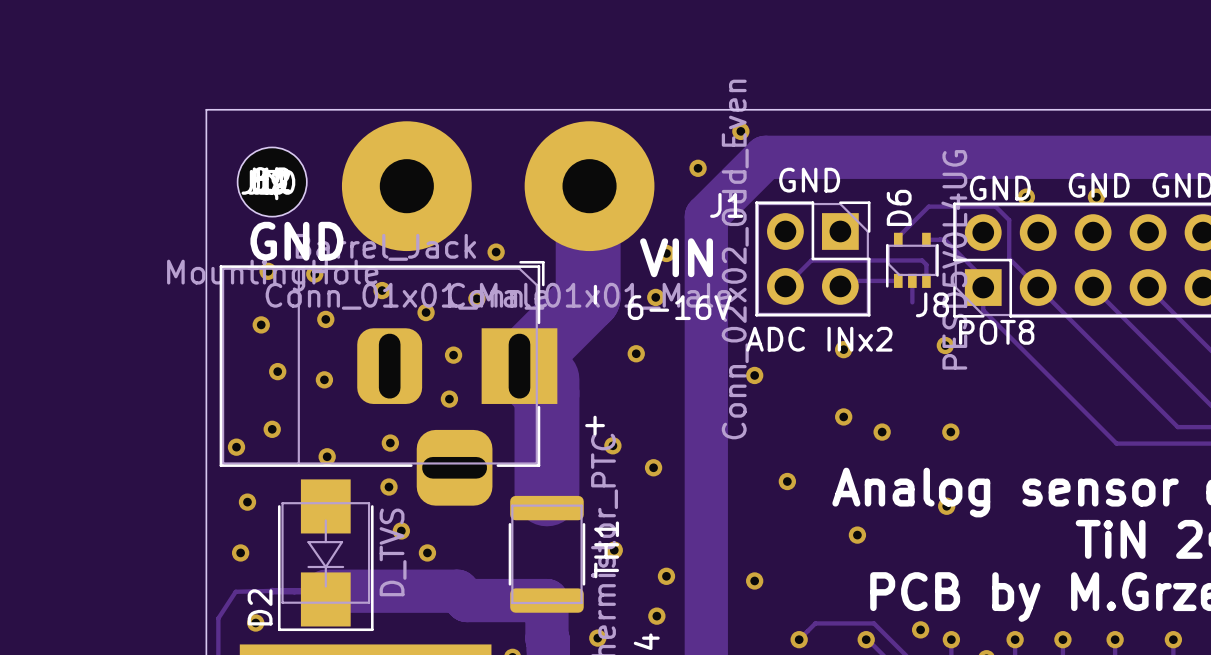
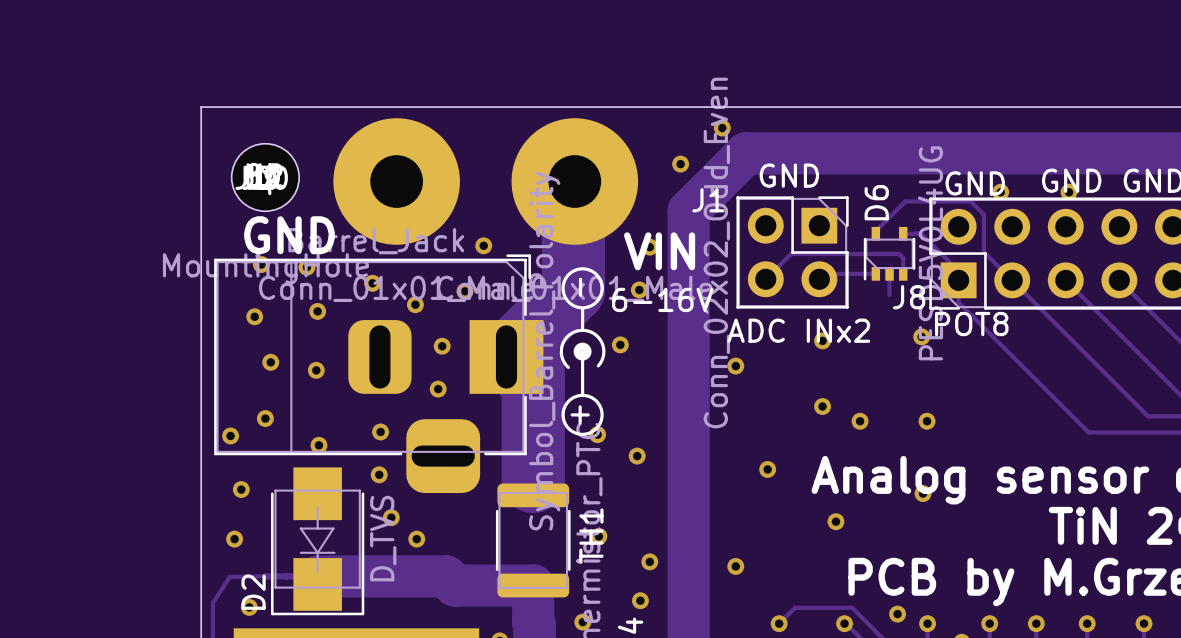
drawing: none -> [559, 267, 606, 436]

